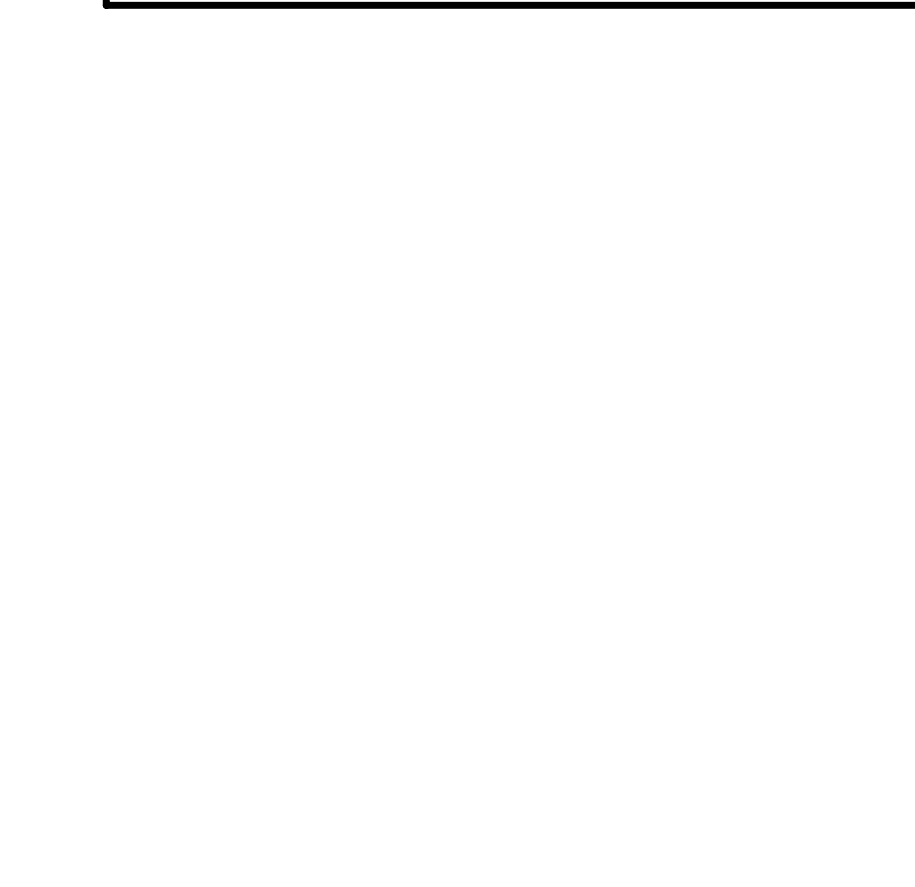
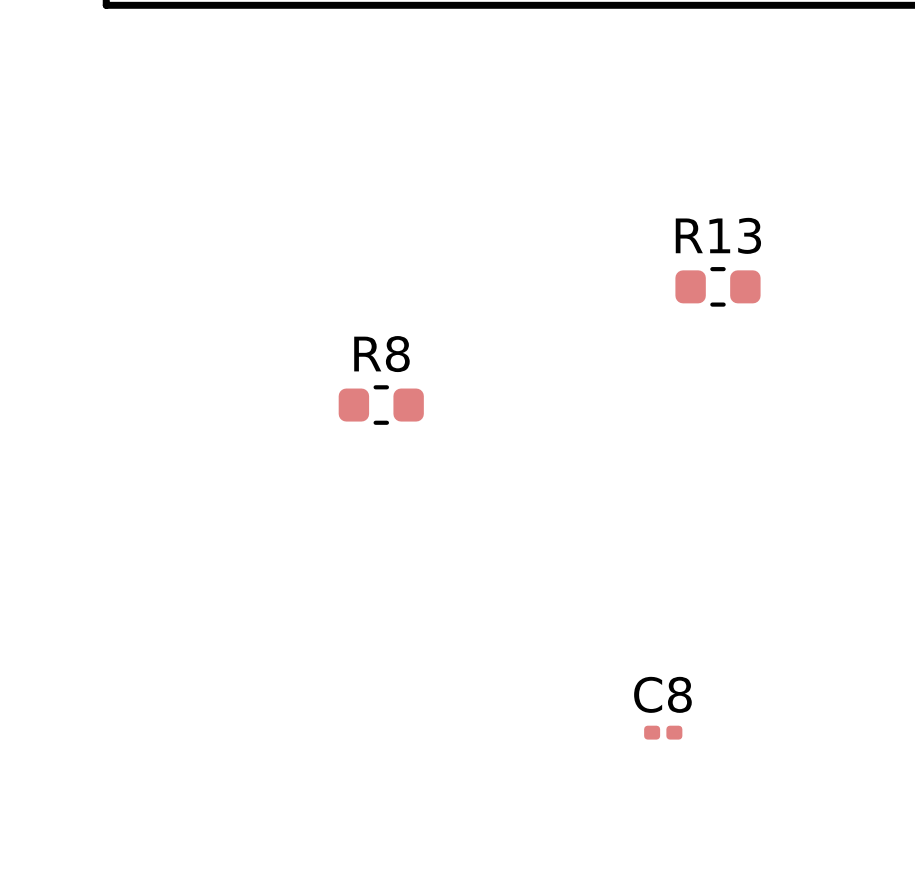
R13: none -> (717, 286)
R8: none -> (381, 405)
C8: none -> (663, 732)

